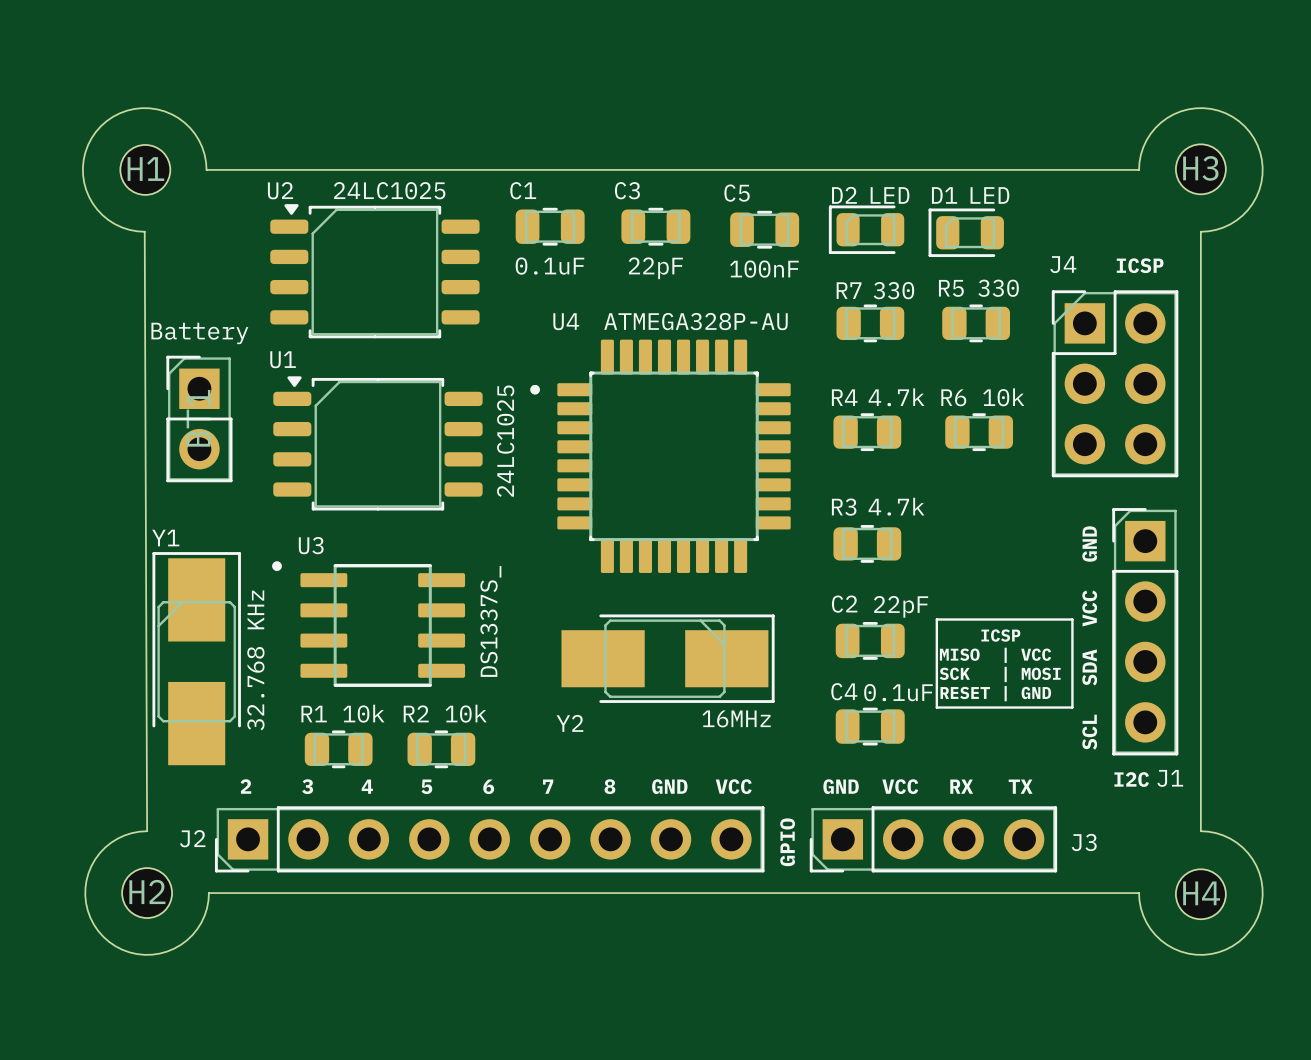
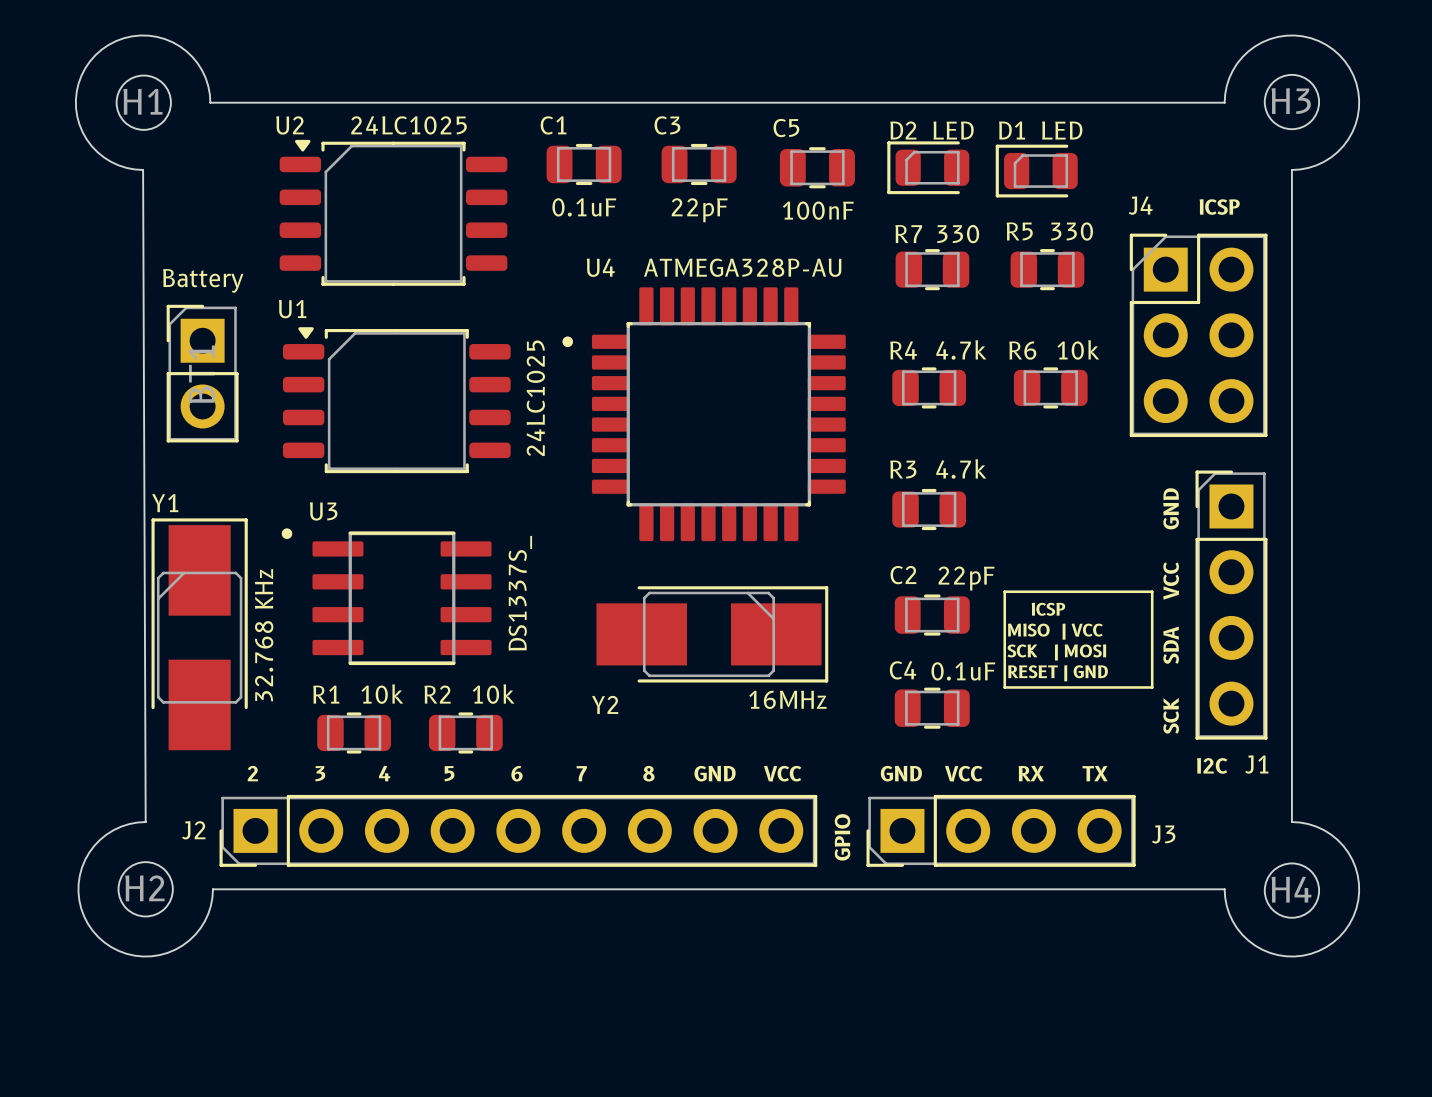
text: SCL (1089, 732) -> SCK (1171, 715)

